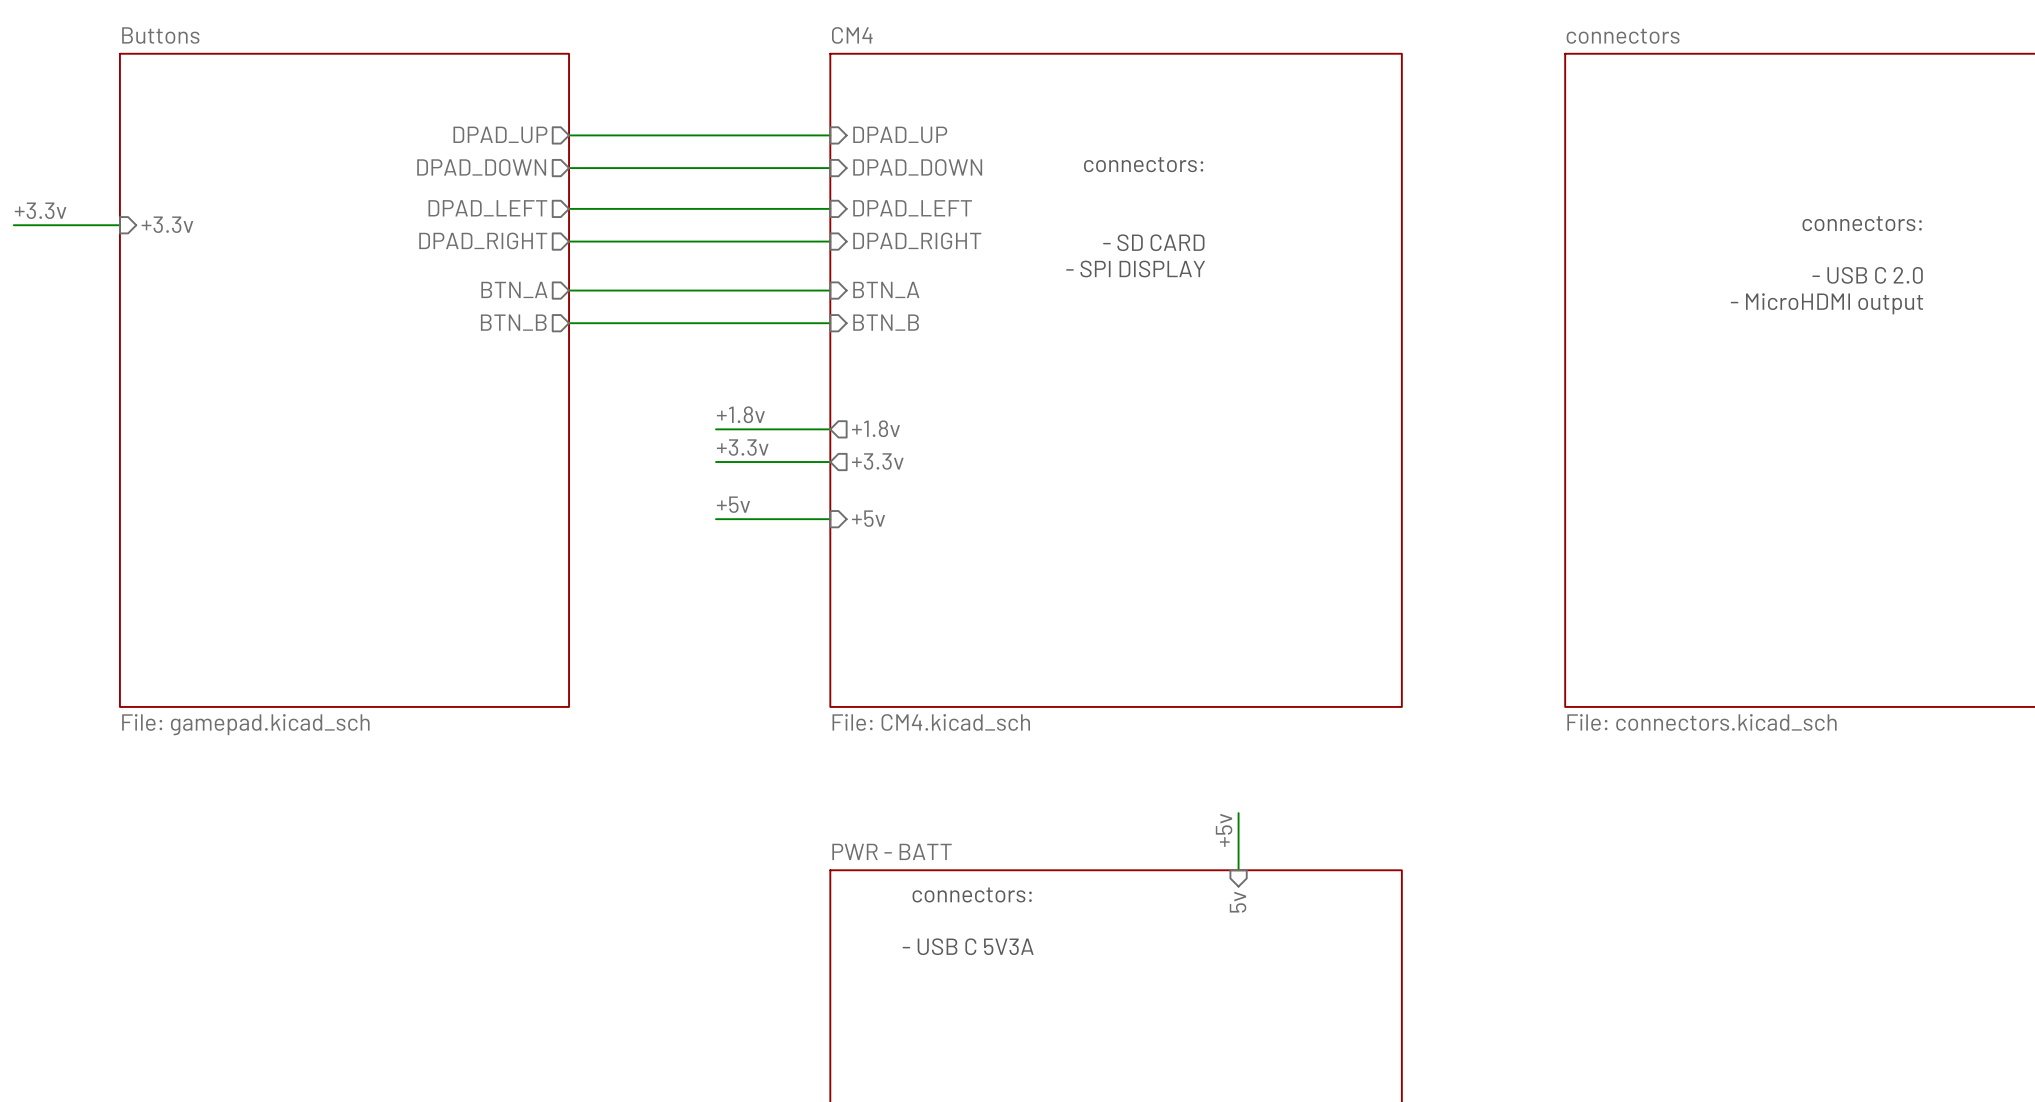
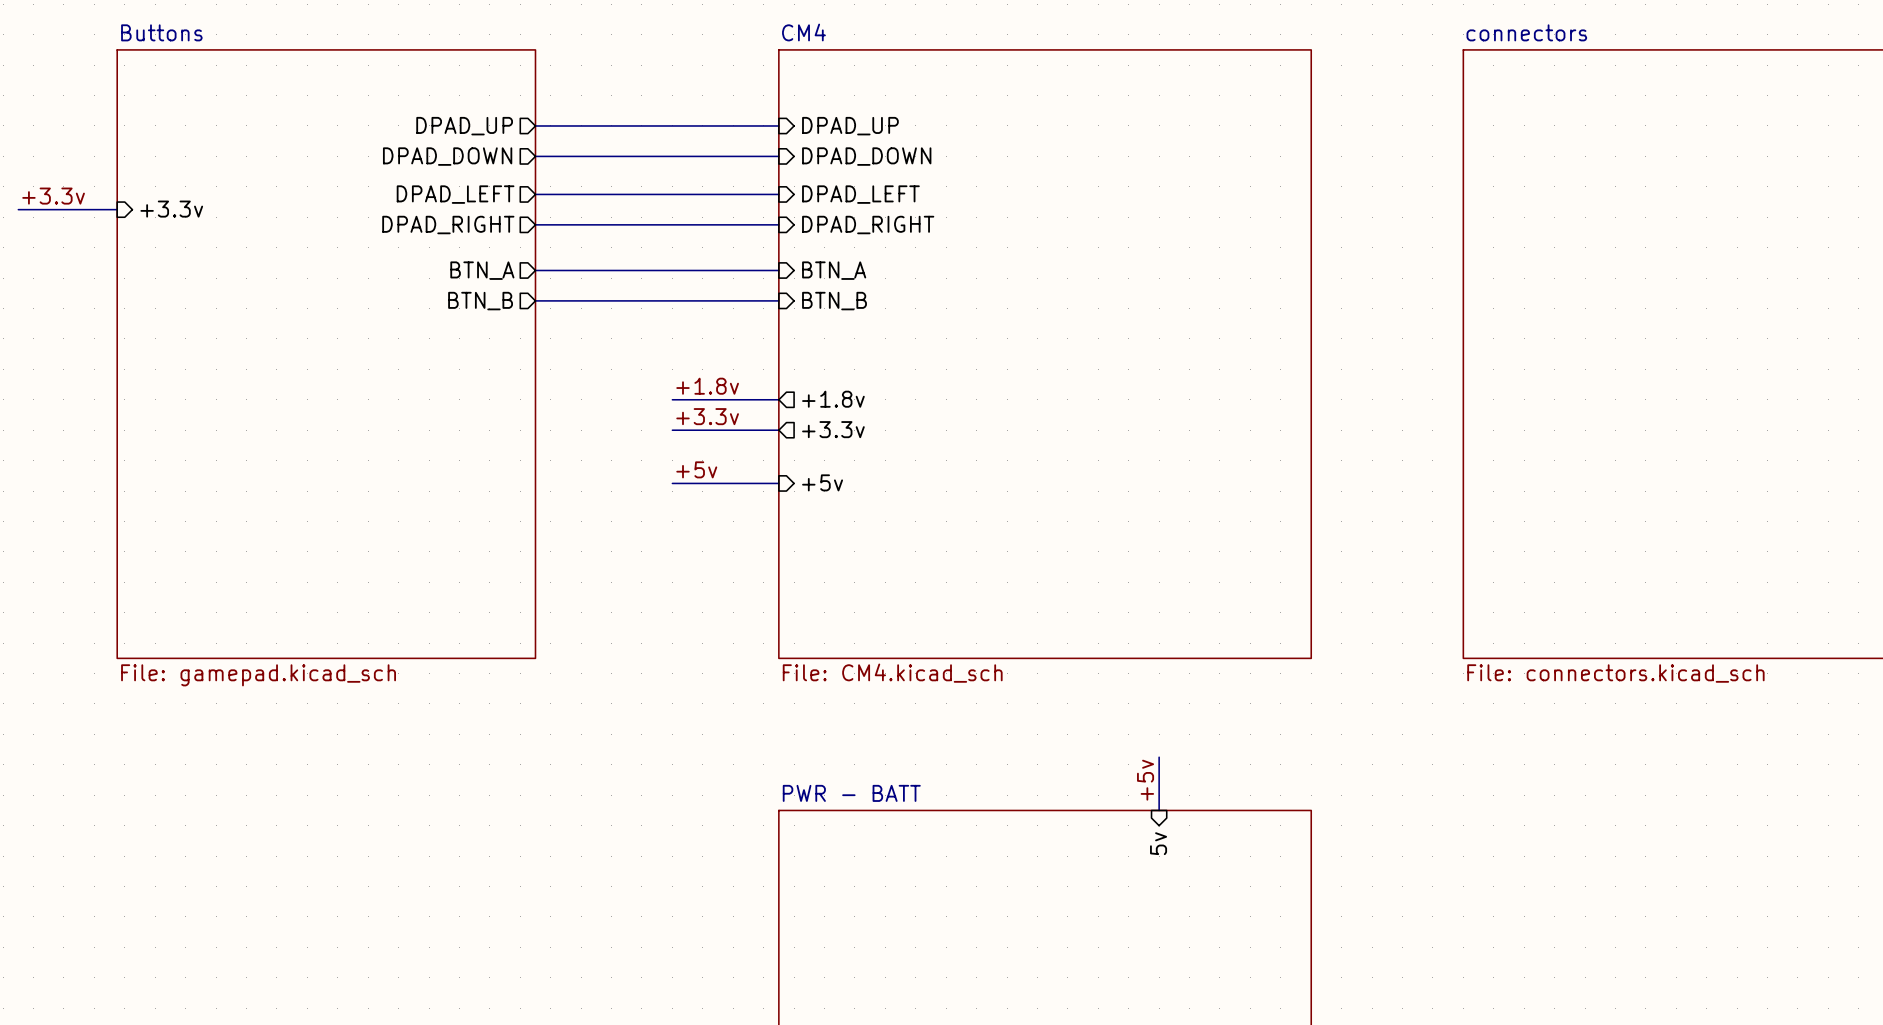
text: connectors: (1143, 164) -> none
text: connectors: (1862, 223) -> none
text: - SD CARD (1153, 242) -> none
text: - SPI DISPLAY (1135, 269) -> none
text: - USB C 2.0 (1867, 275) -> none
text: - MicroHDMI output (1826, 303) -> none
text: connectors: (972, 894) -> none
text: - USB C 5V3A (968, 946) -> none

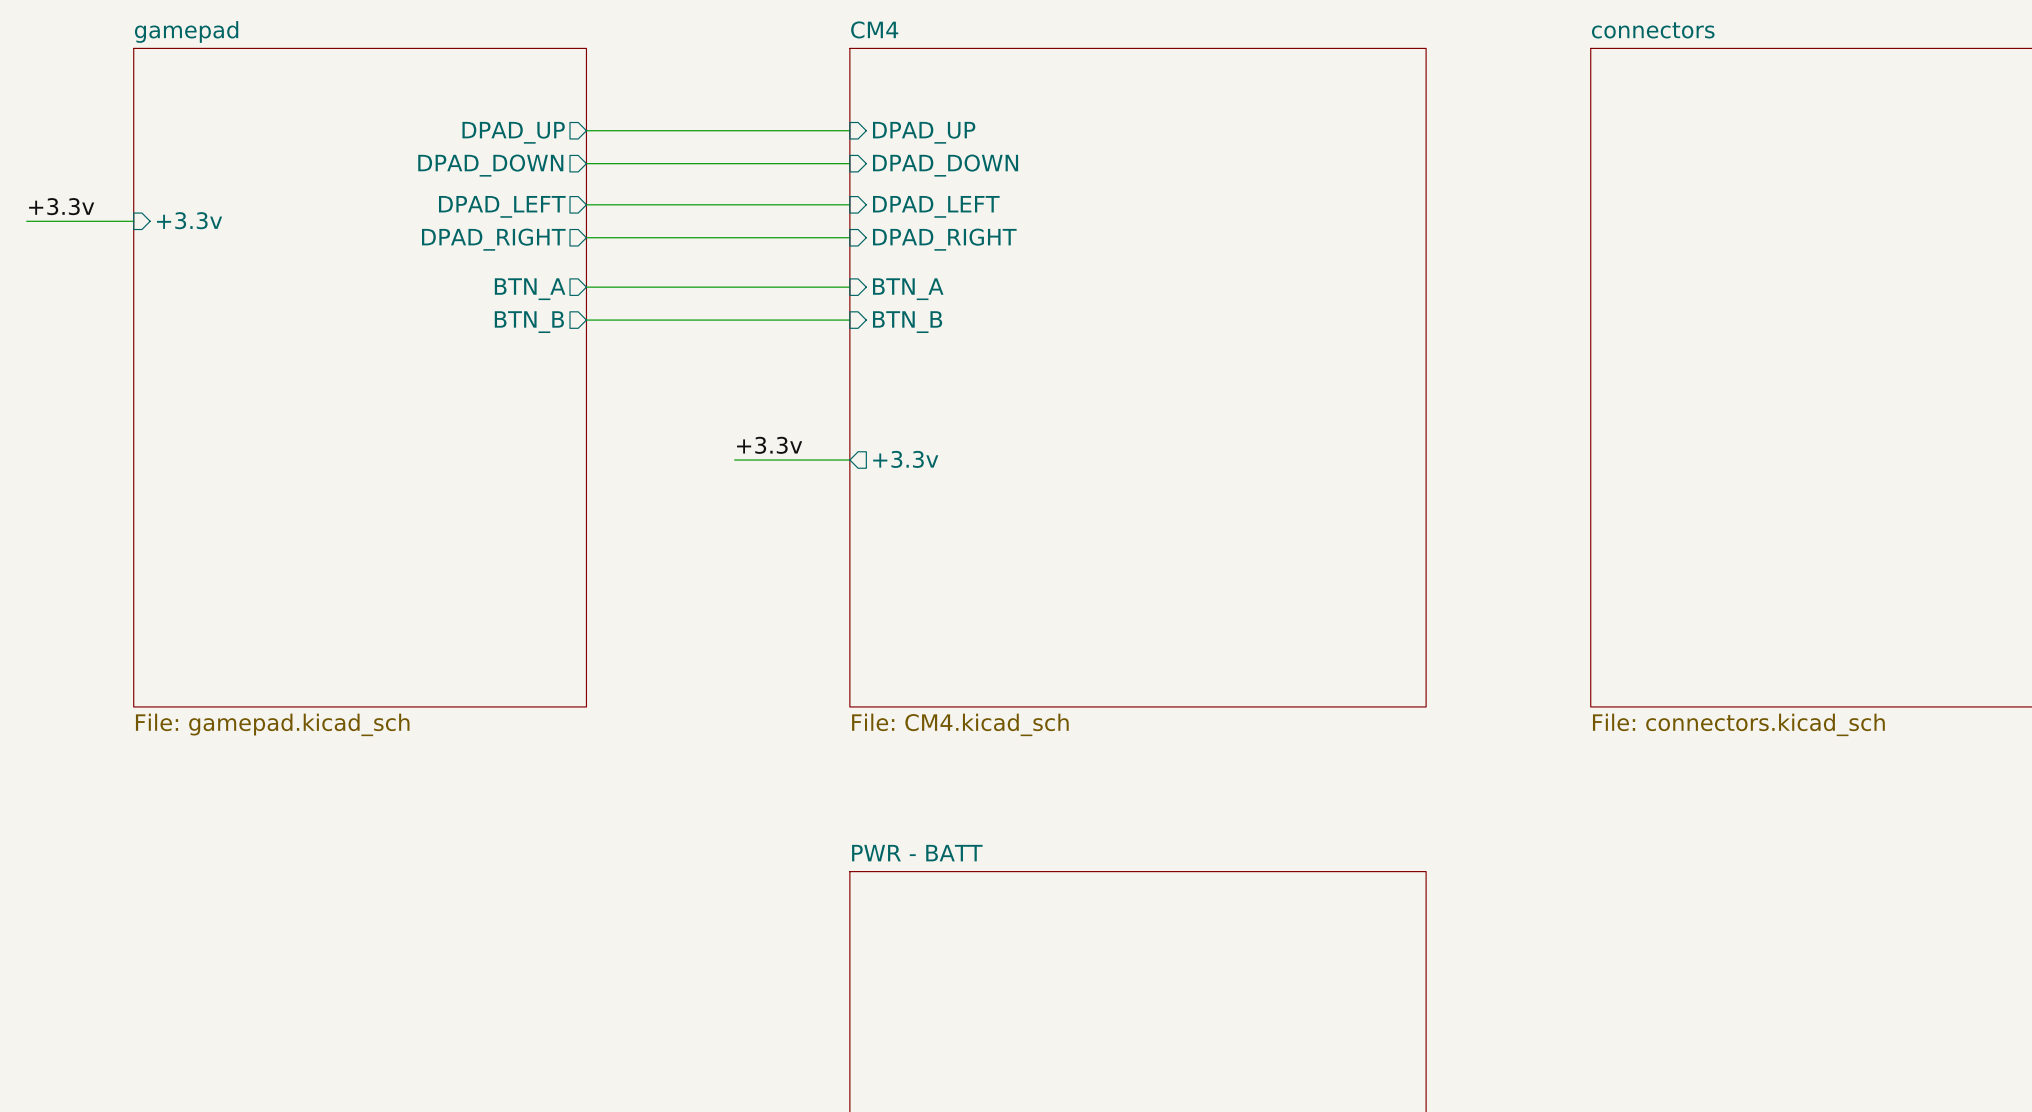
sheet Buttons name: Buttons (161, 32) -> gamepad (186, 31)
label: +1.8v (707, 386) -> none
wire: (672, 399) (778, 399) -> none
sheet pin: +1.8v (833, 399) -> none
label: +5v (696, 469) -> none
sheet pin: +5v (822, 482) -> none
wire: (672, 483) (778, 483) -> none
wire: (1159, 757) (1159, 810) -> none
label: +5v (1145, 780) -> none
sheet pin: 5v (1158, 843) -> none

